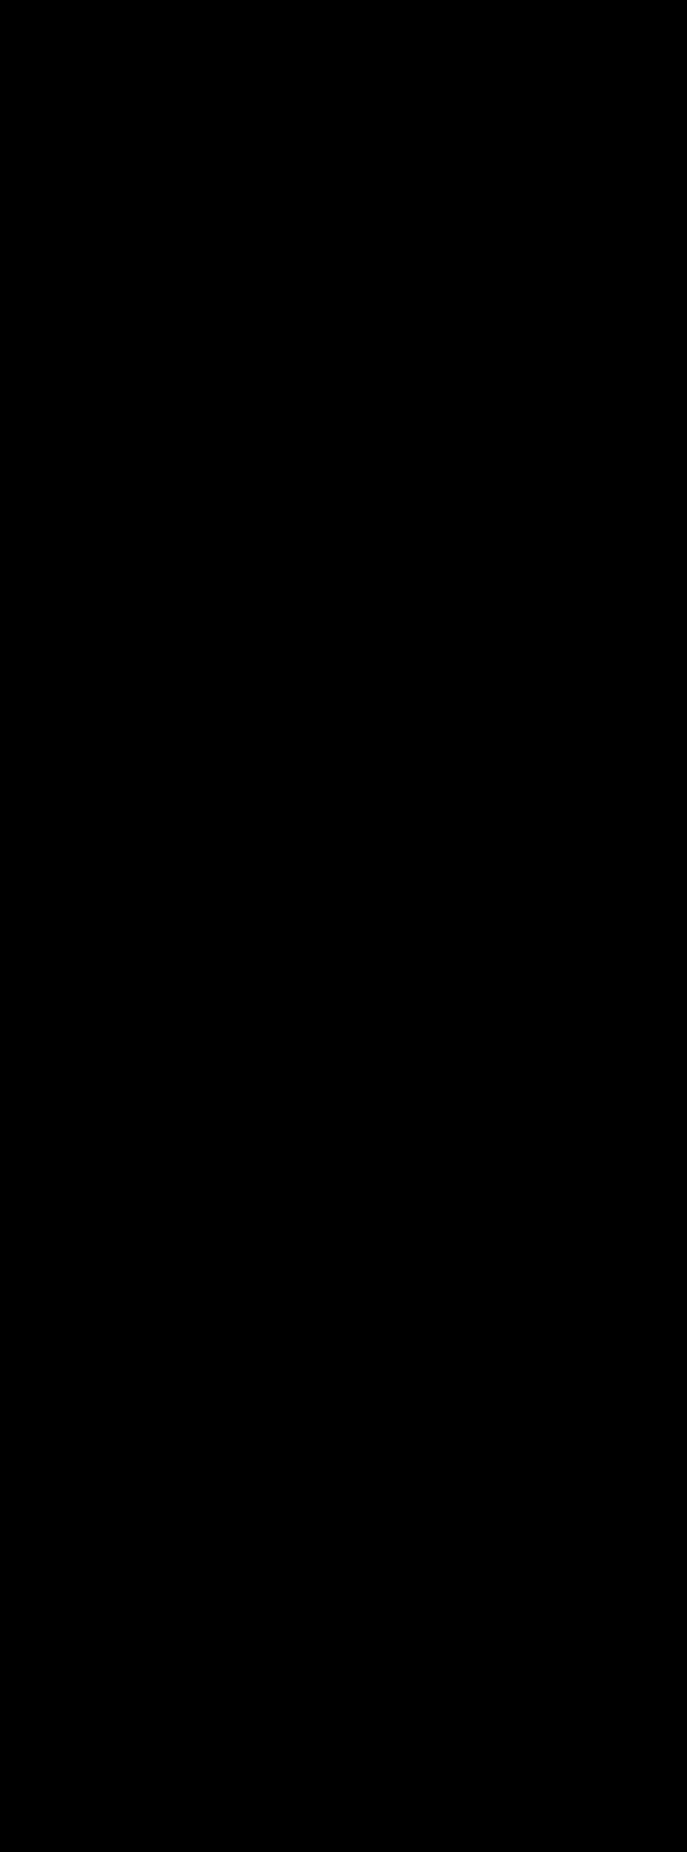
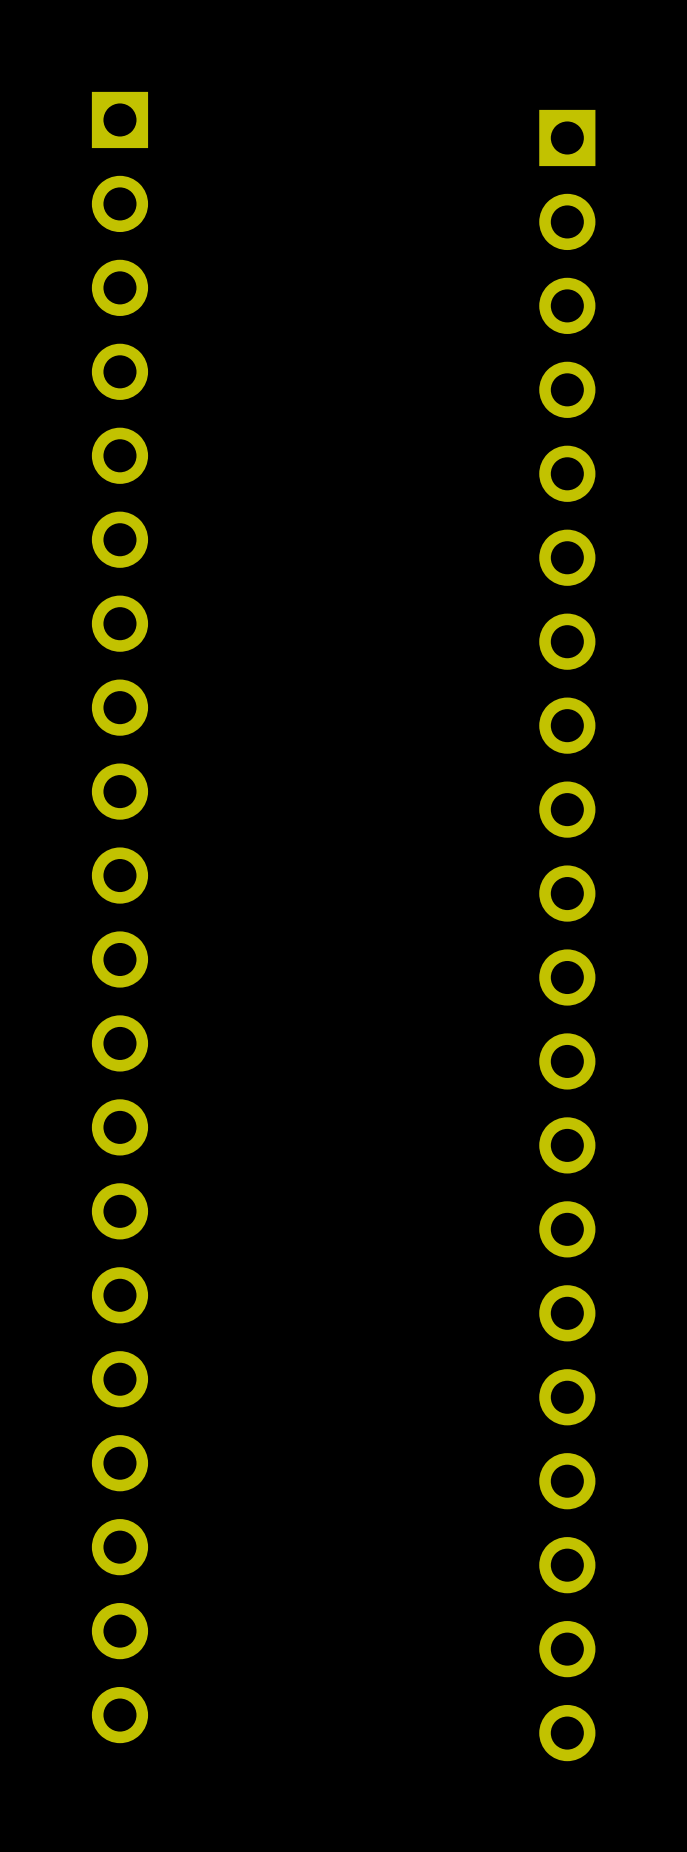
part: none -> (119, 917)
part: none -> (567, 935)

